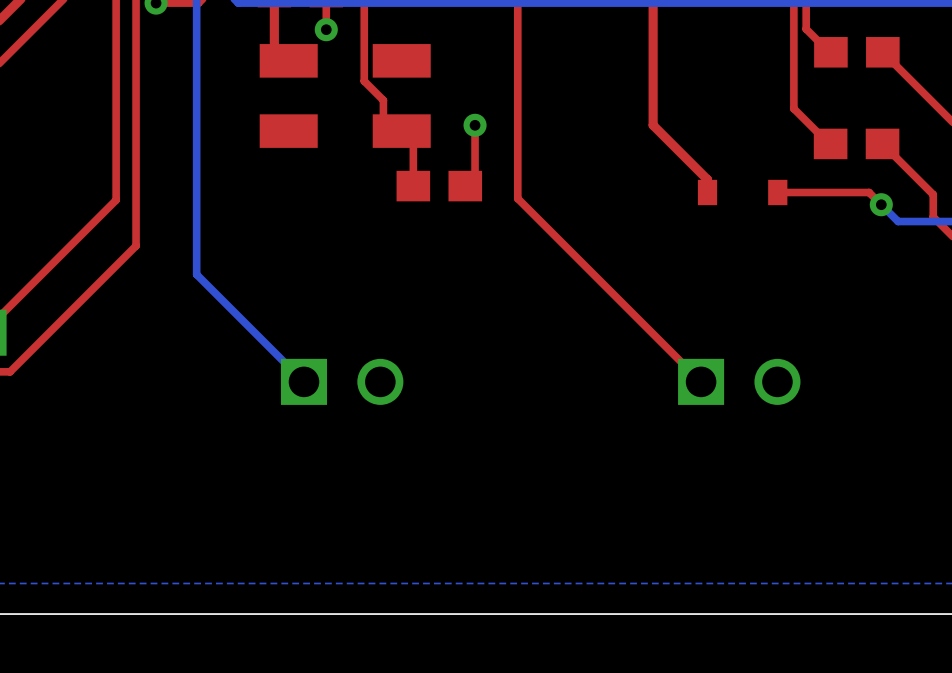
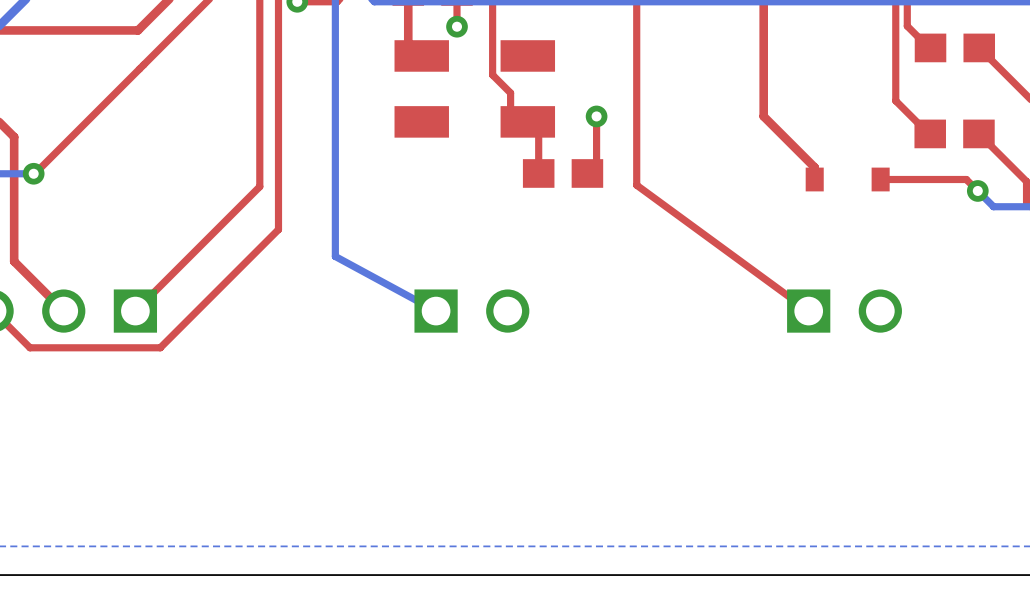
top track: (517, 198) (701, 381) -> (636, 185) (808, 311)
bottom track: (196, 274) (303, 381) -> (335, 256) (436, 311)
part position: (342, 381) -> (471, 311)
part position: (739, 381) -> (844, 311)

